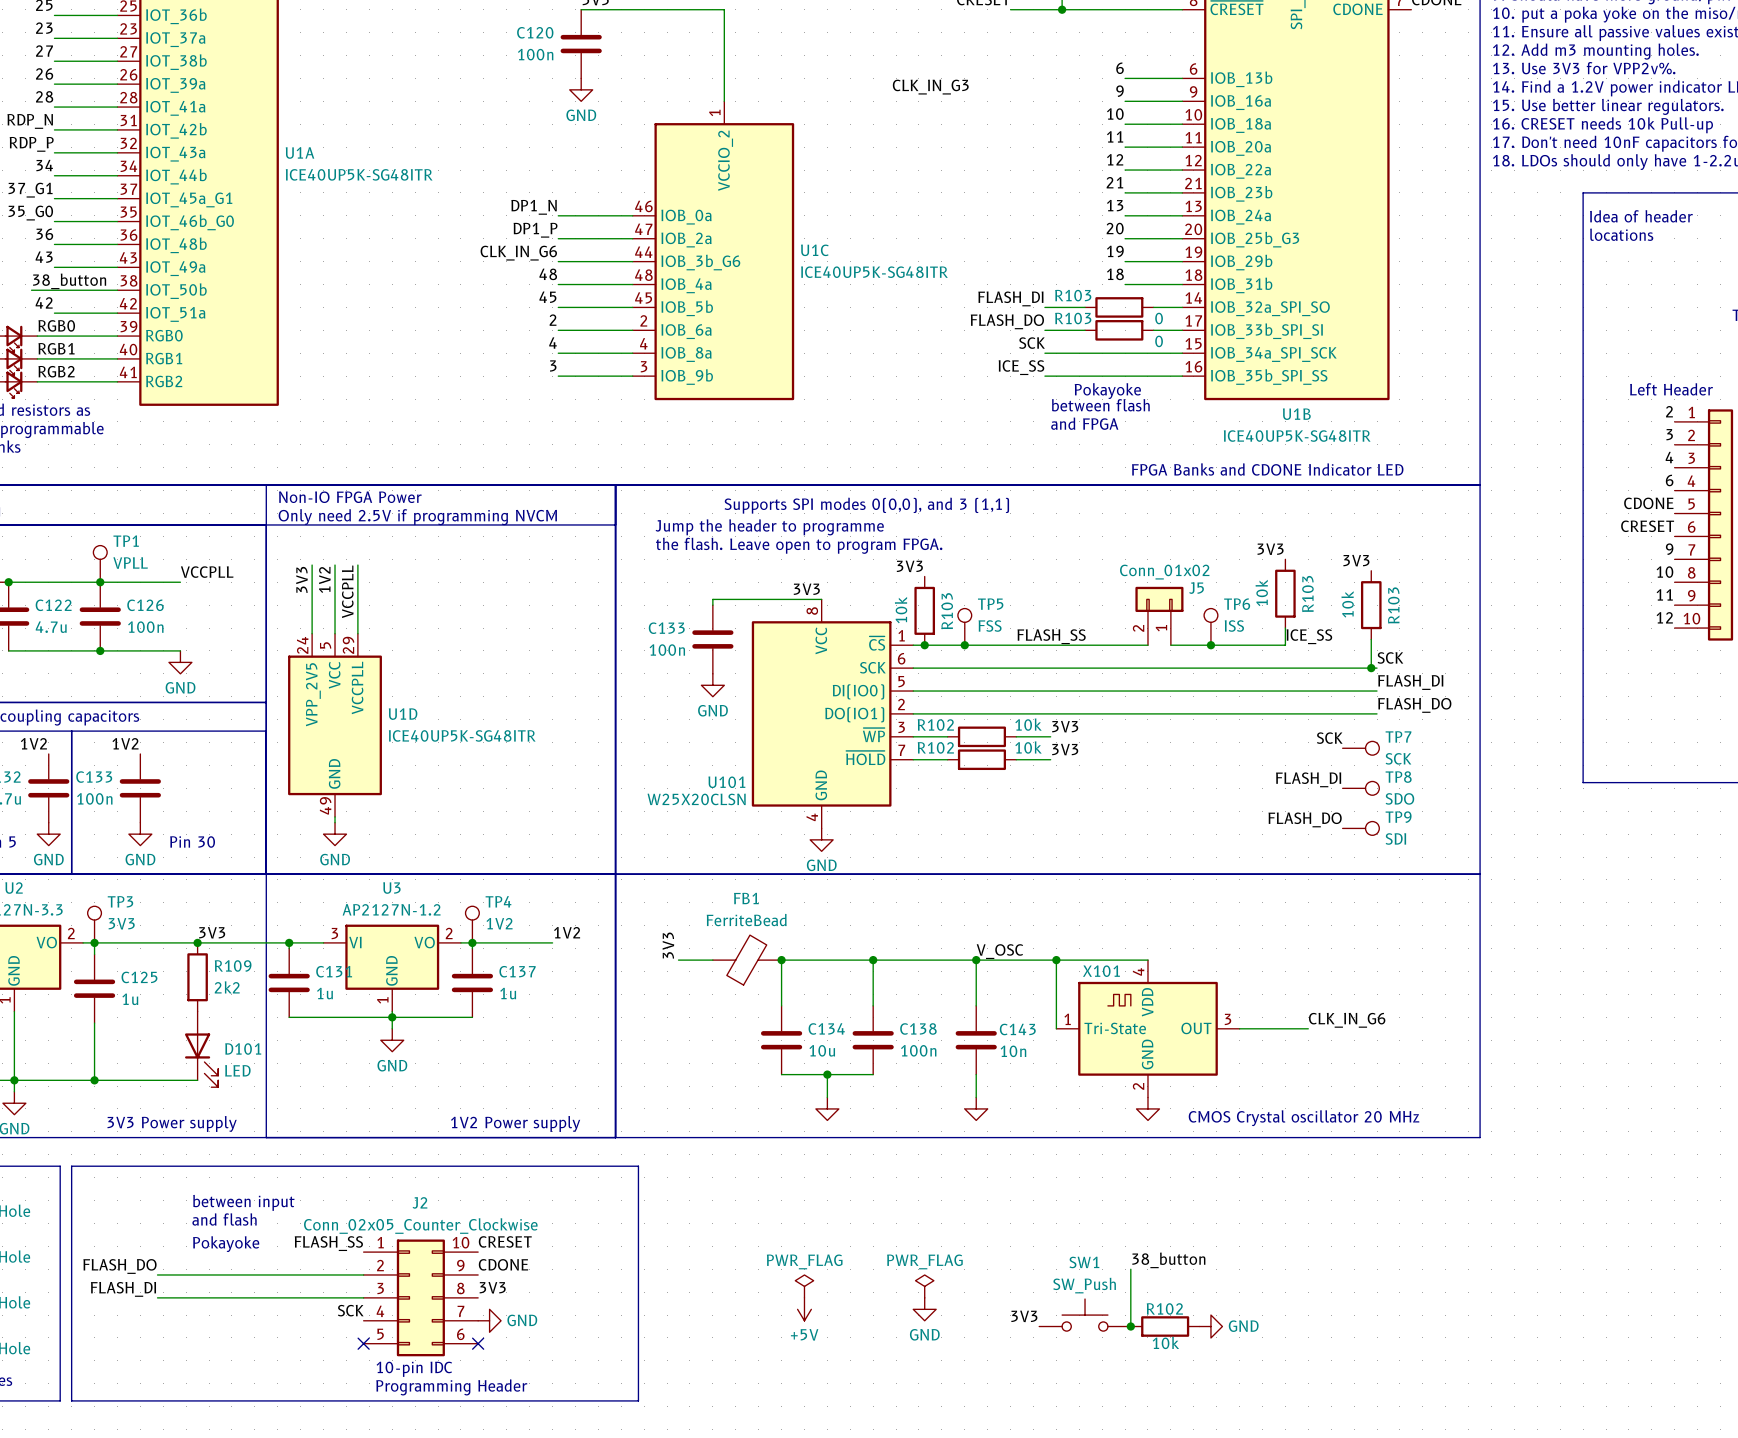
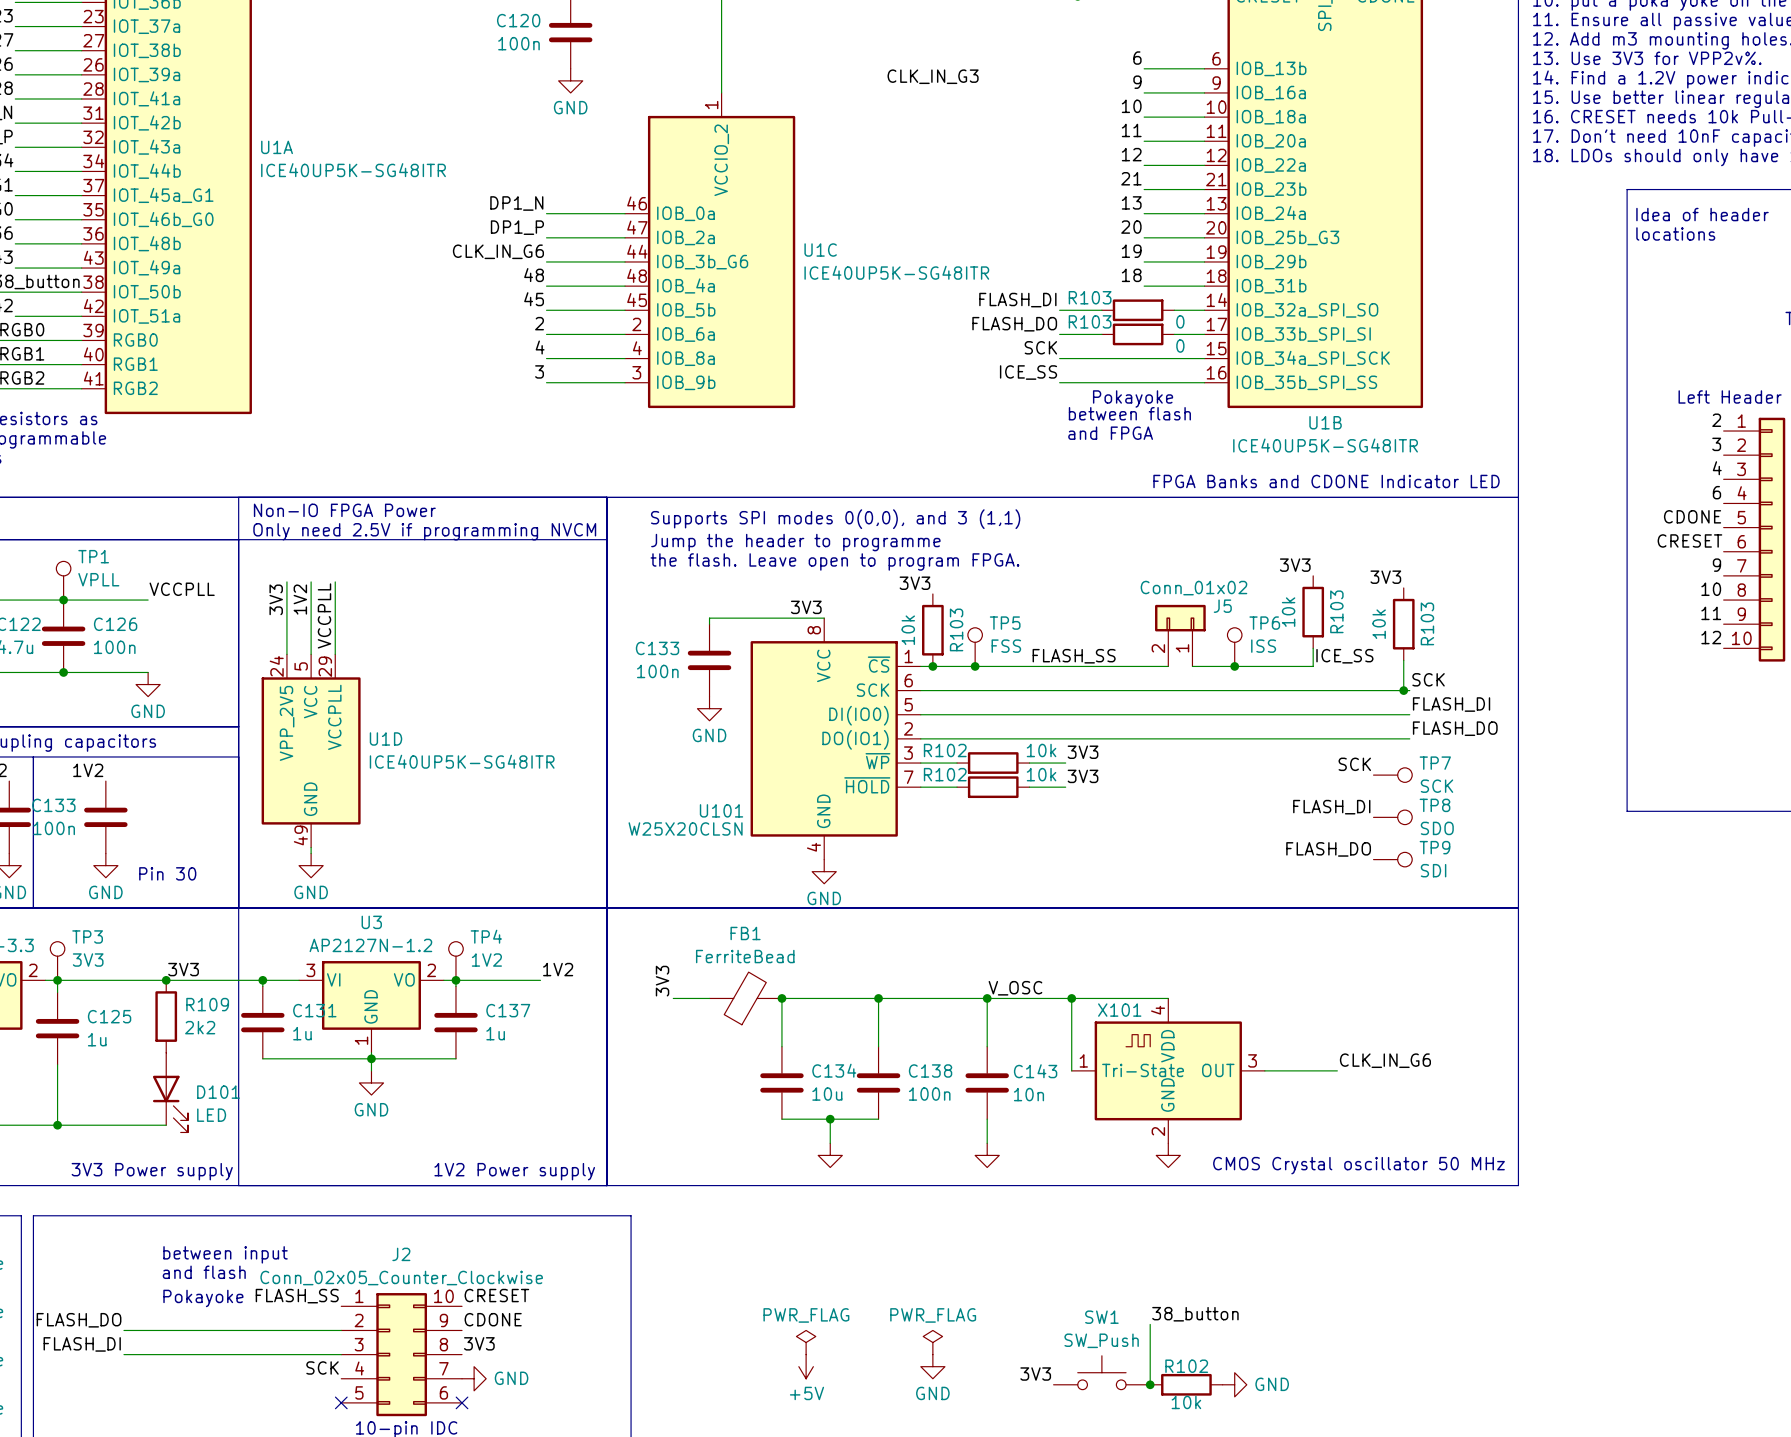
text: CMOS Crystal oscillator 20 MHz (1304, 1118) -> CMOS Crystal oscillator 50 MHz (1358, 1165)

